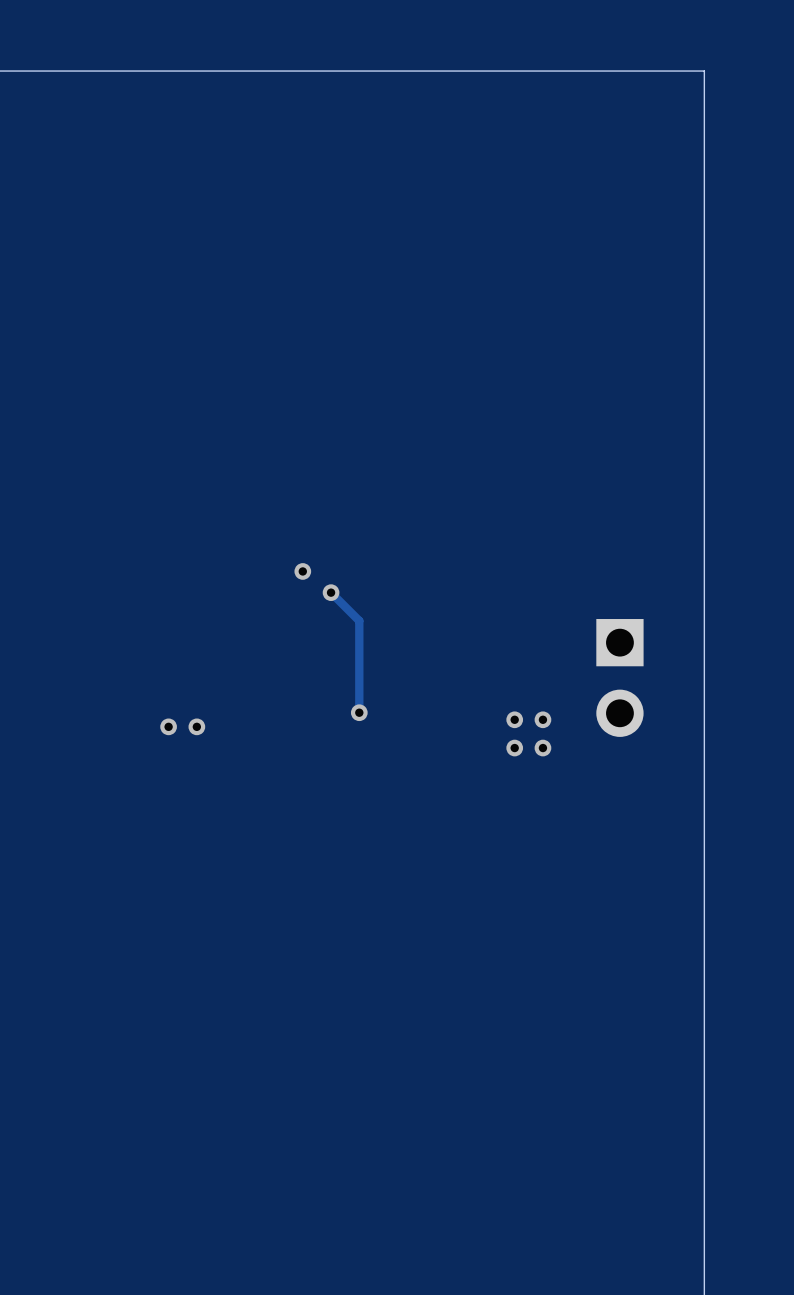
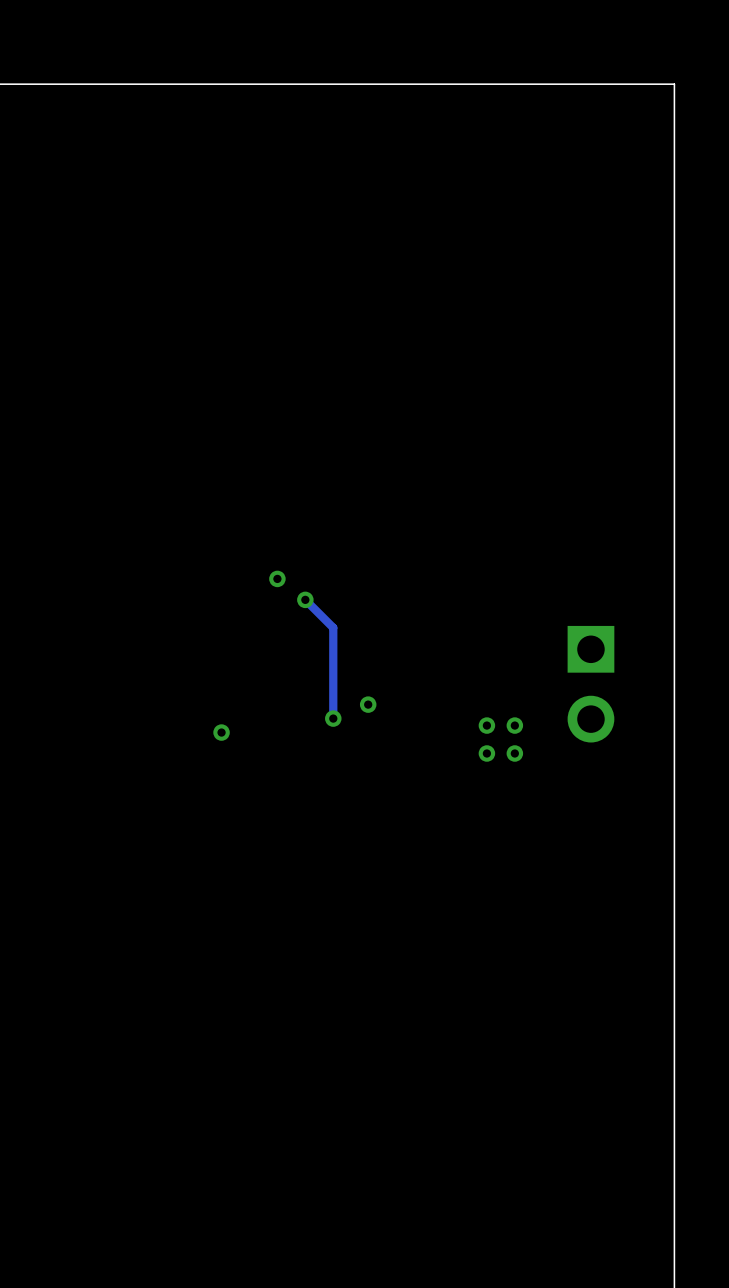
via: none -> (368, 704)
via: (168, 726) -> none
via: (196, 726) -> none
via: none -> (221, 732)

